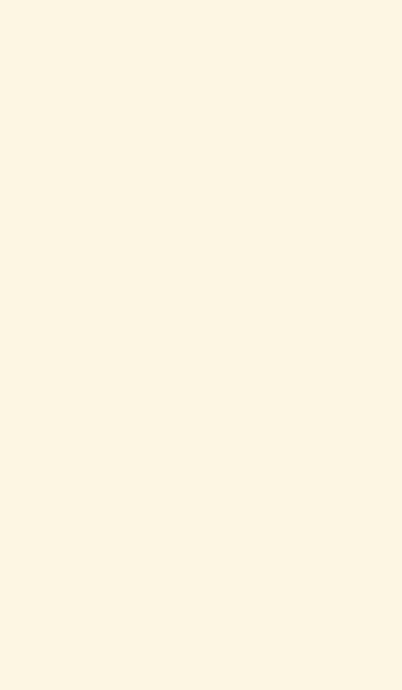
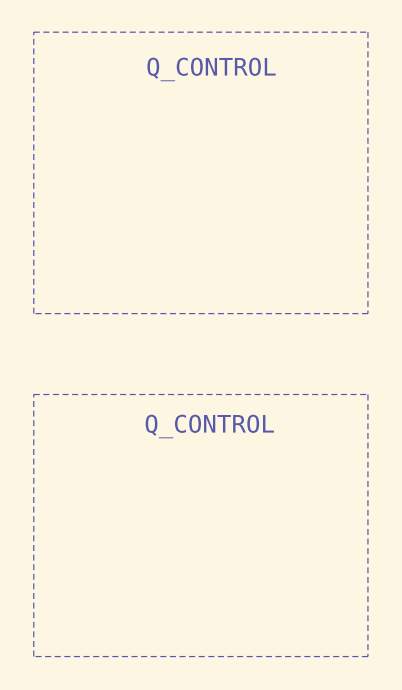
line: none -> (33, 32) (367, 32) (367, 313) (33, 313) (33, 32)
text: none -> Q_CONTROL (211, 69)
line: none -> (33, 394) (33, 656) (367, 656) (367, 394) (33, 394)
text: none -> Q_CONTROL (209, 426)

